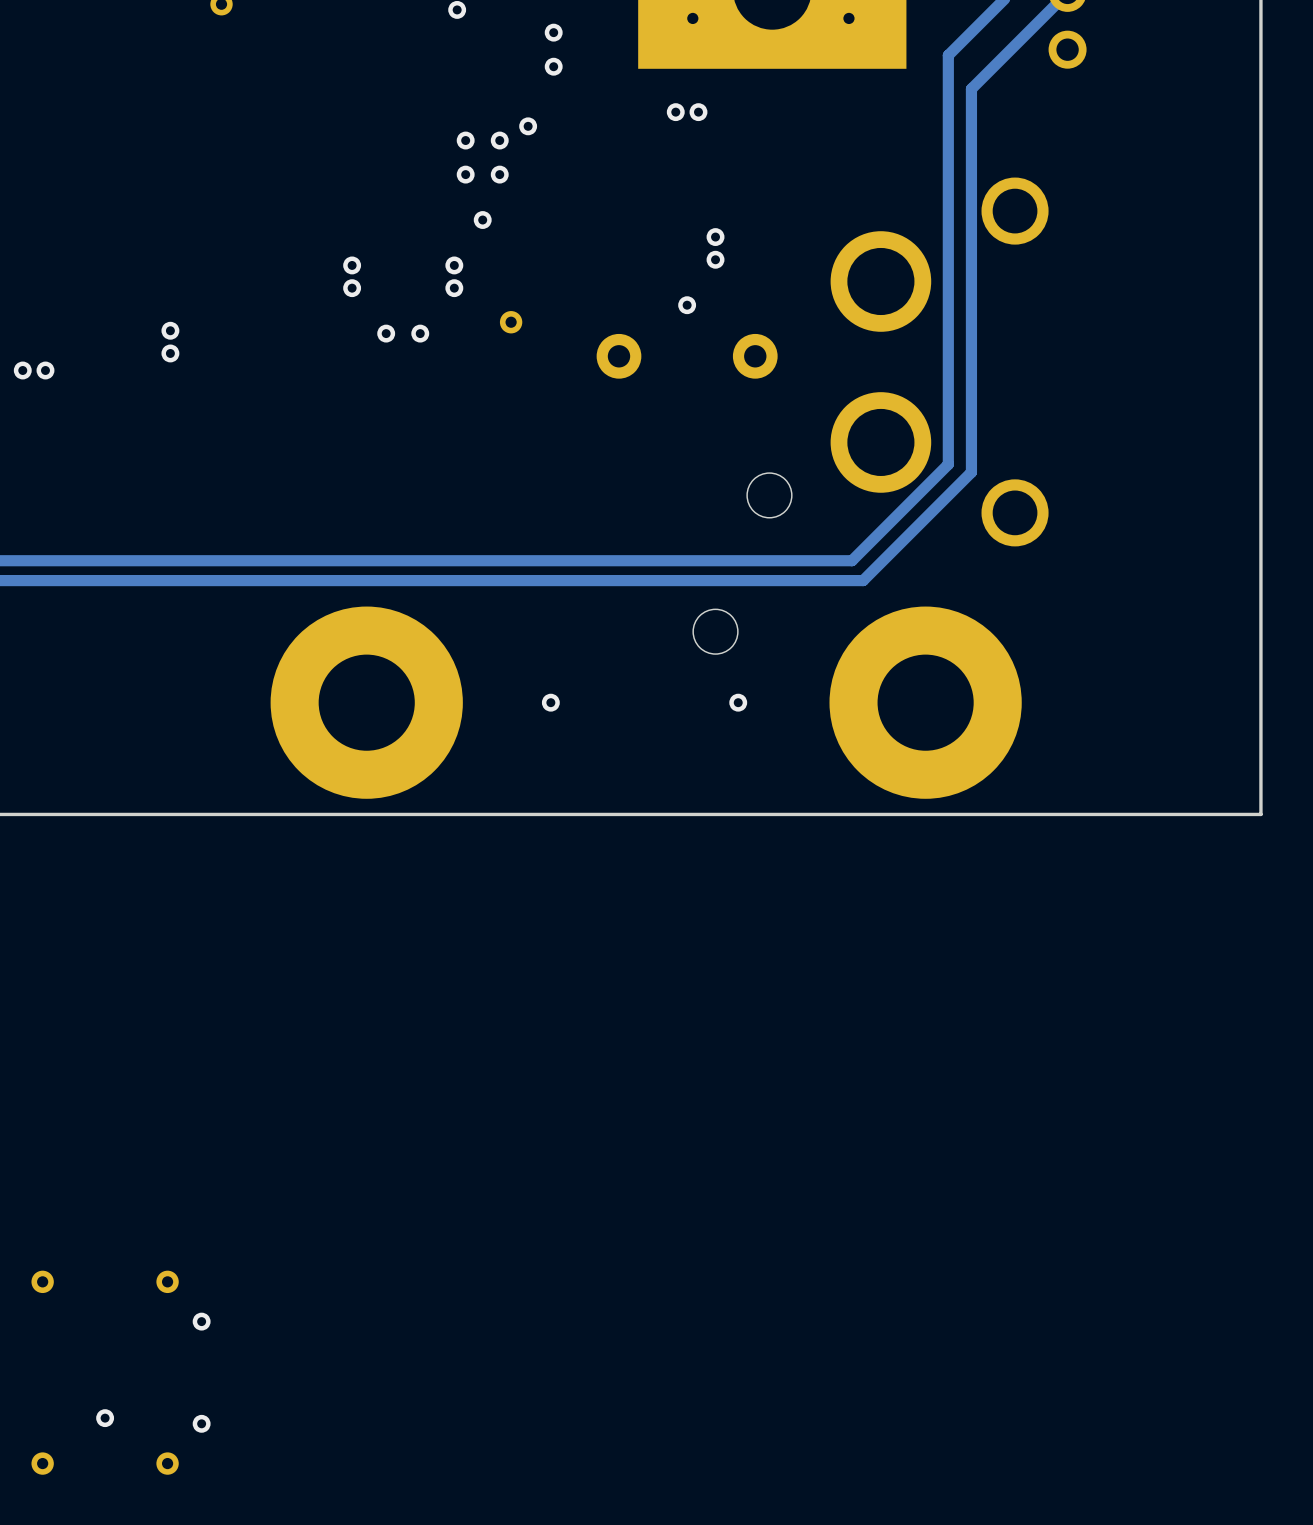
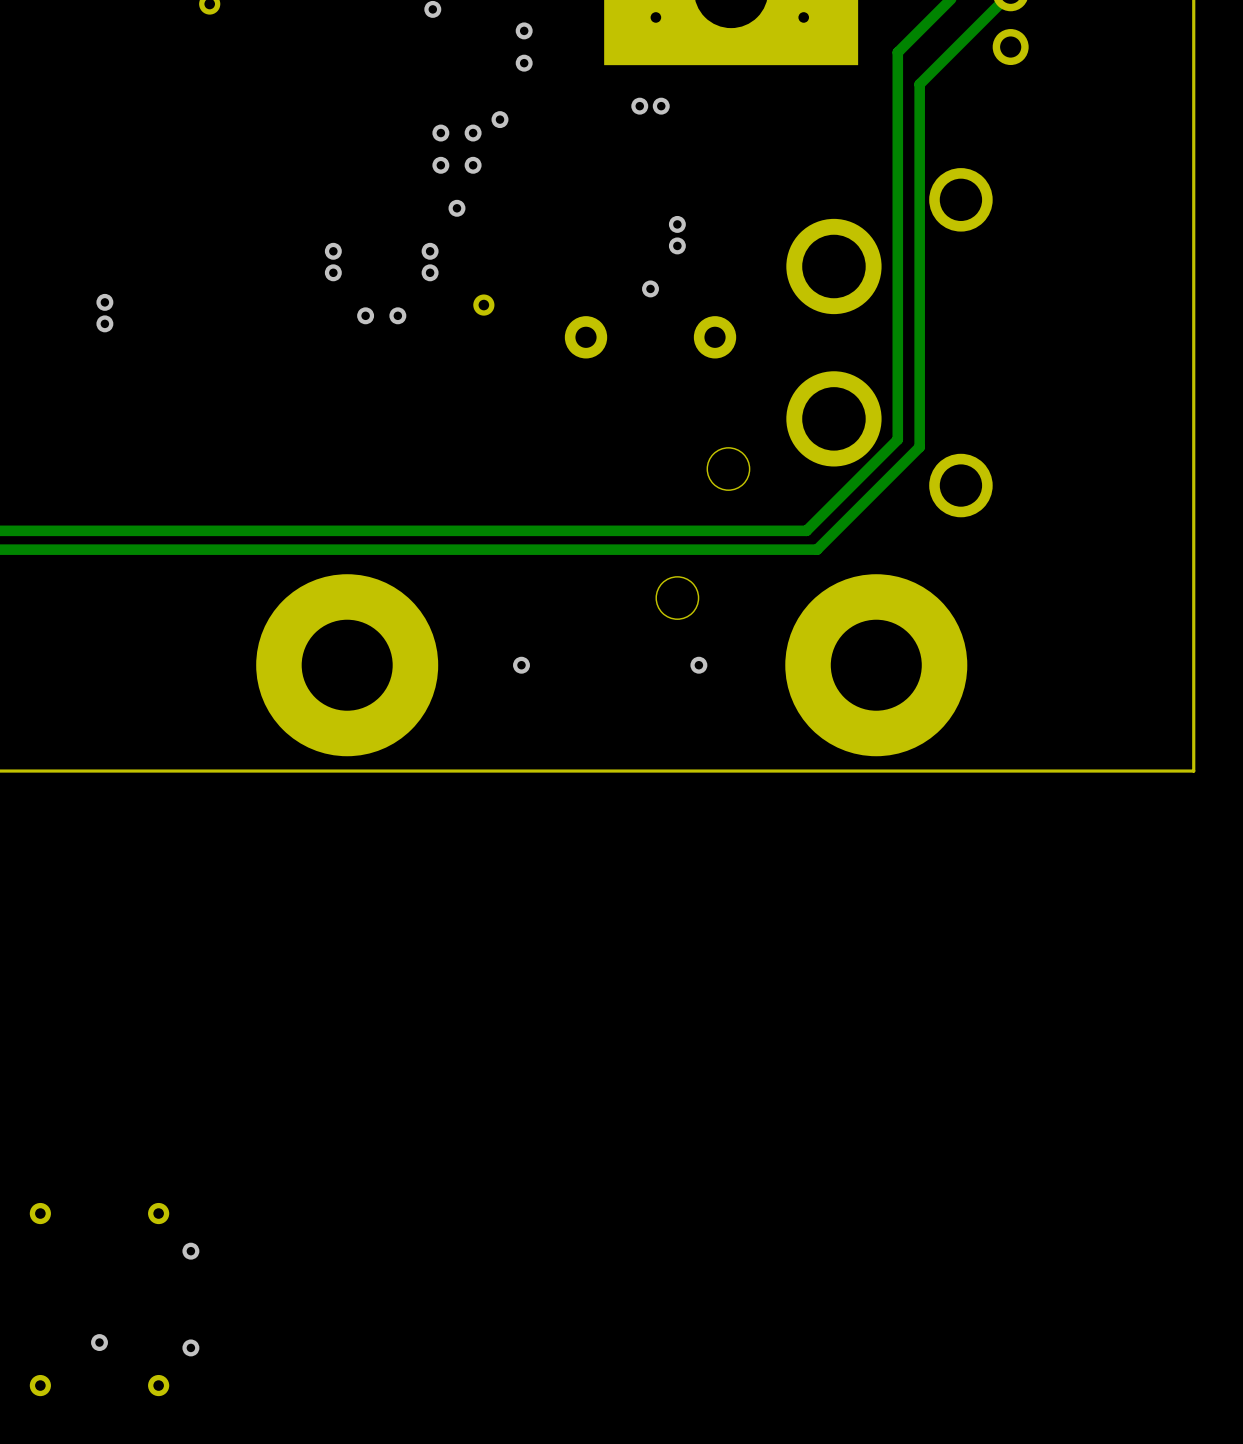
via: none -> (104, 302)
via: (170, 330) -> none
via: none -> (104, 323)
via: (170, 353) -> none
via: (22, 370) -> none
via: (45, 370) -> none

